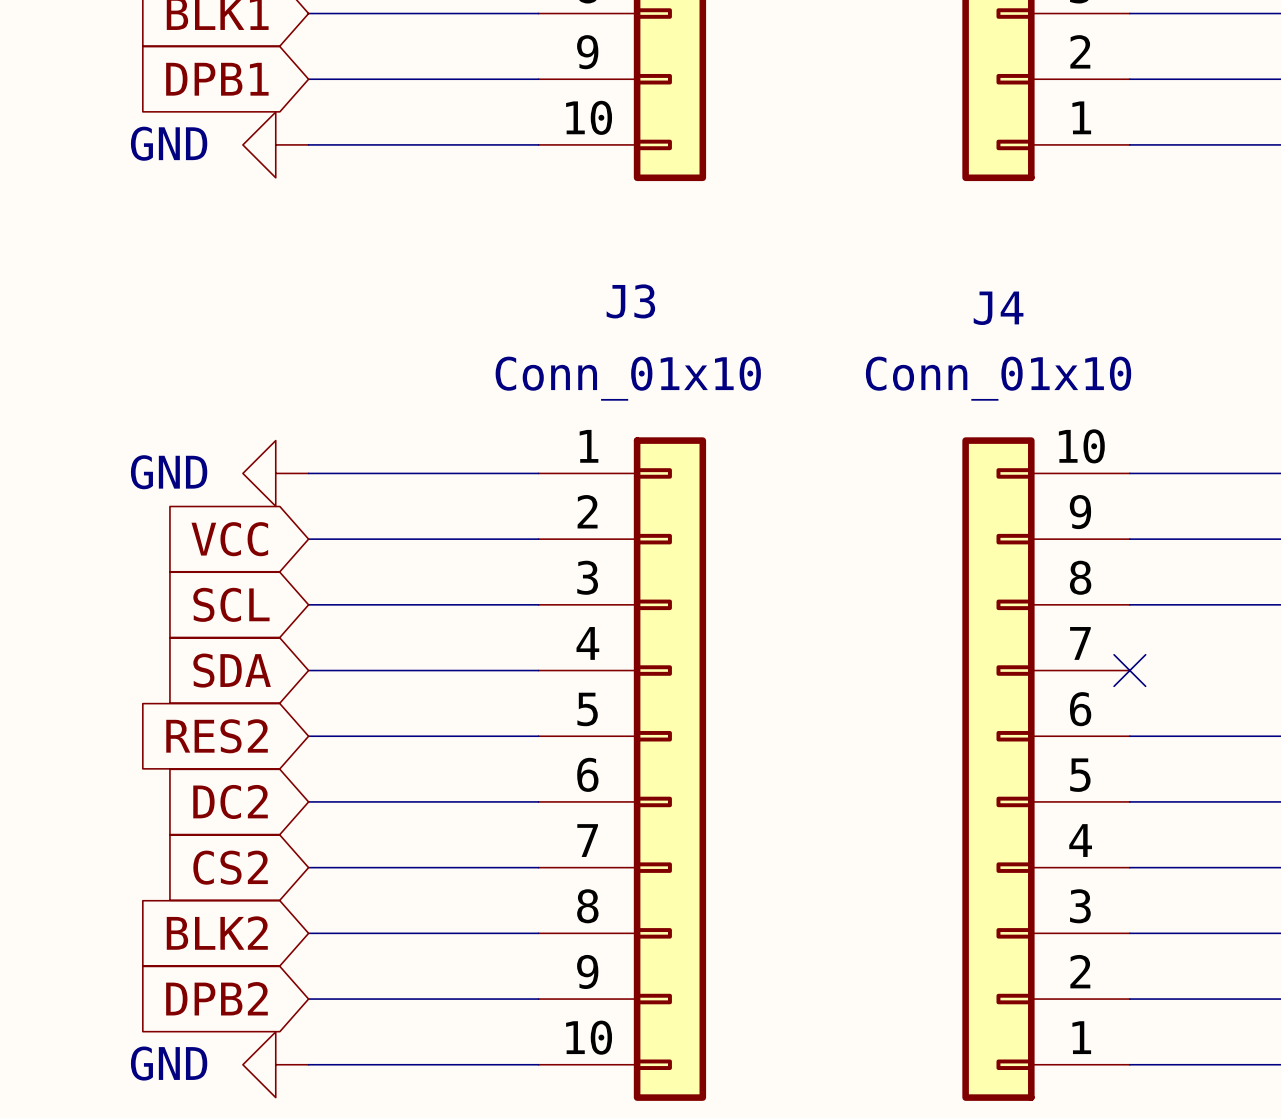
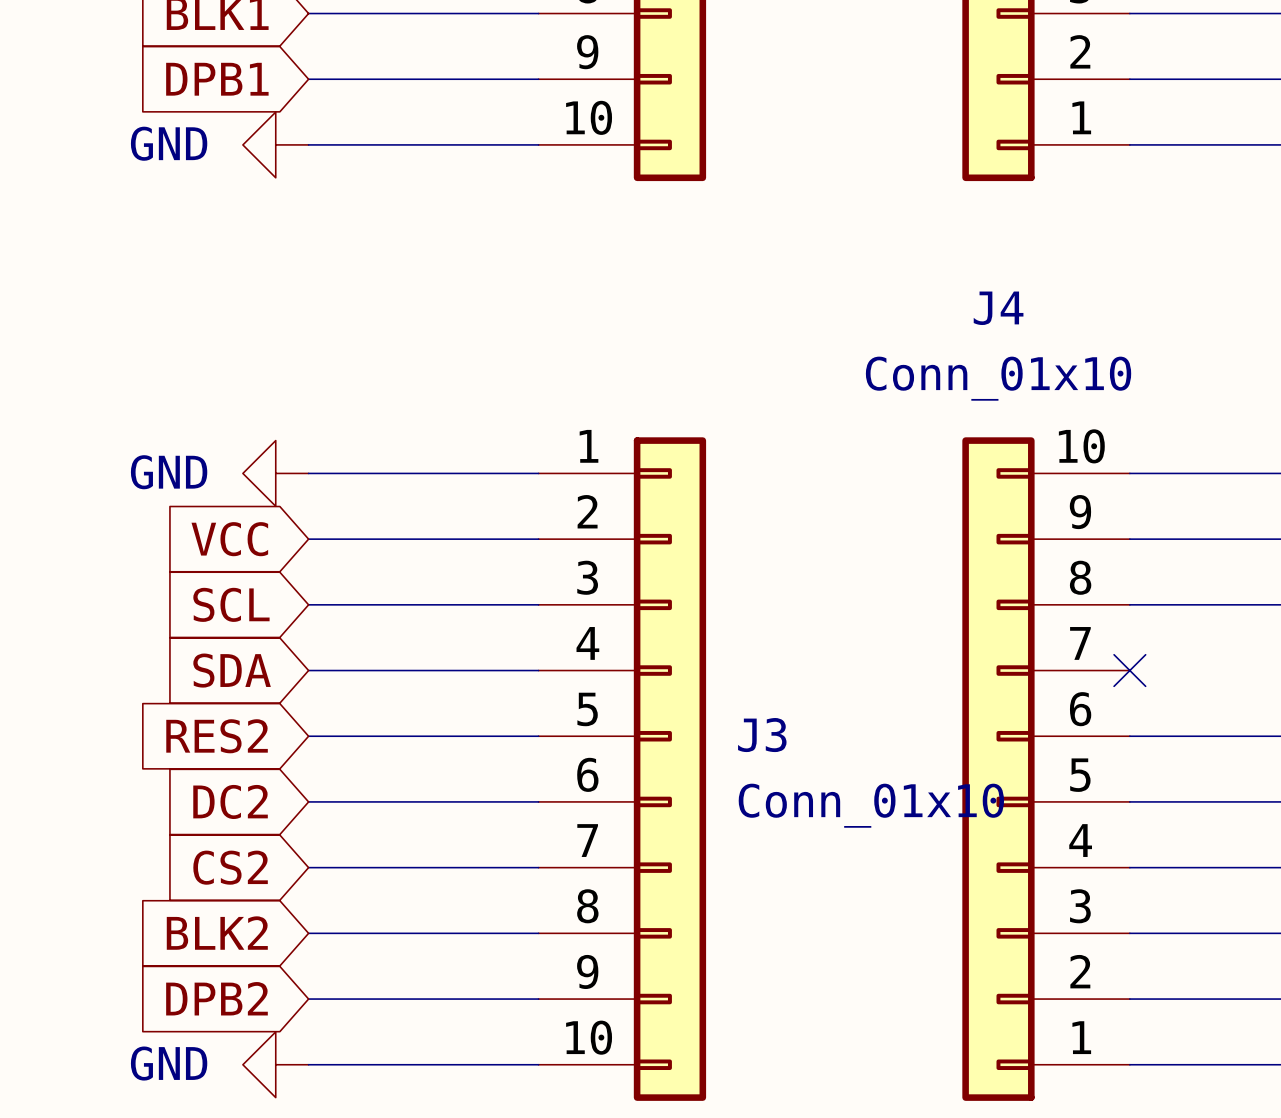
J3 name position: J3 (630, 301) -> J3 (762, 735)
J3 value position: Conn_01x10 (628, 378) -> Conn_01x10 (871, 805)

